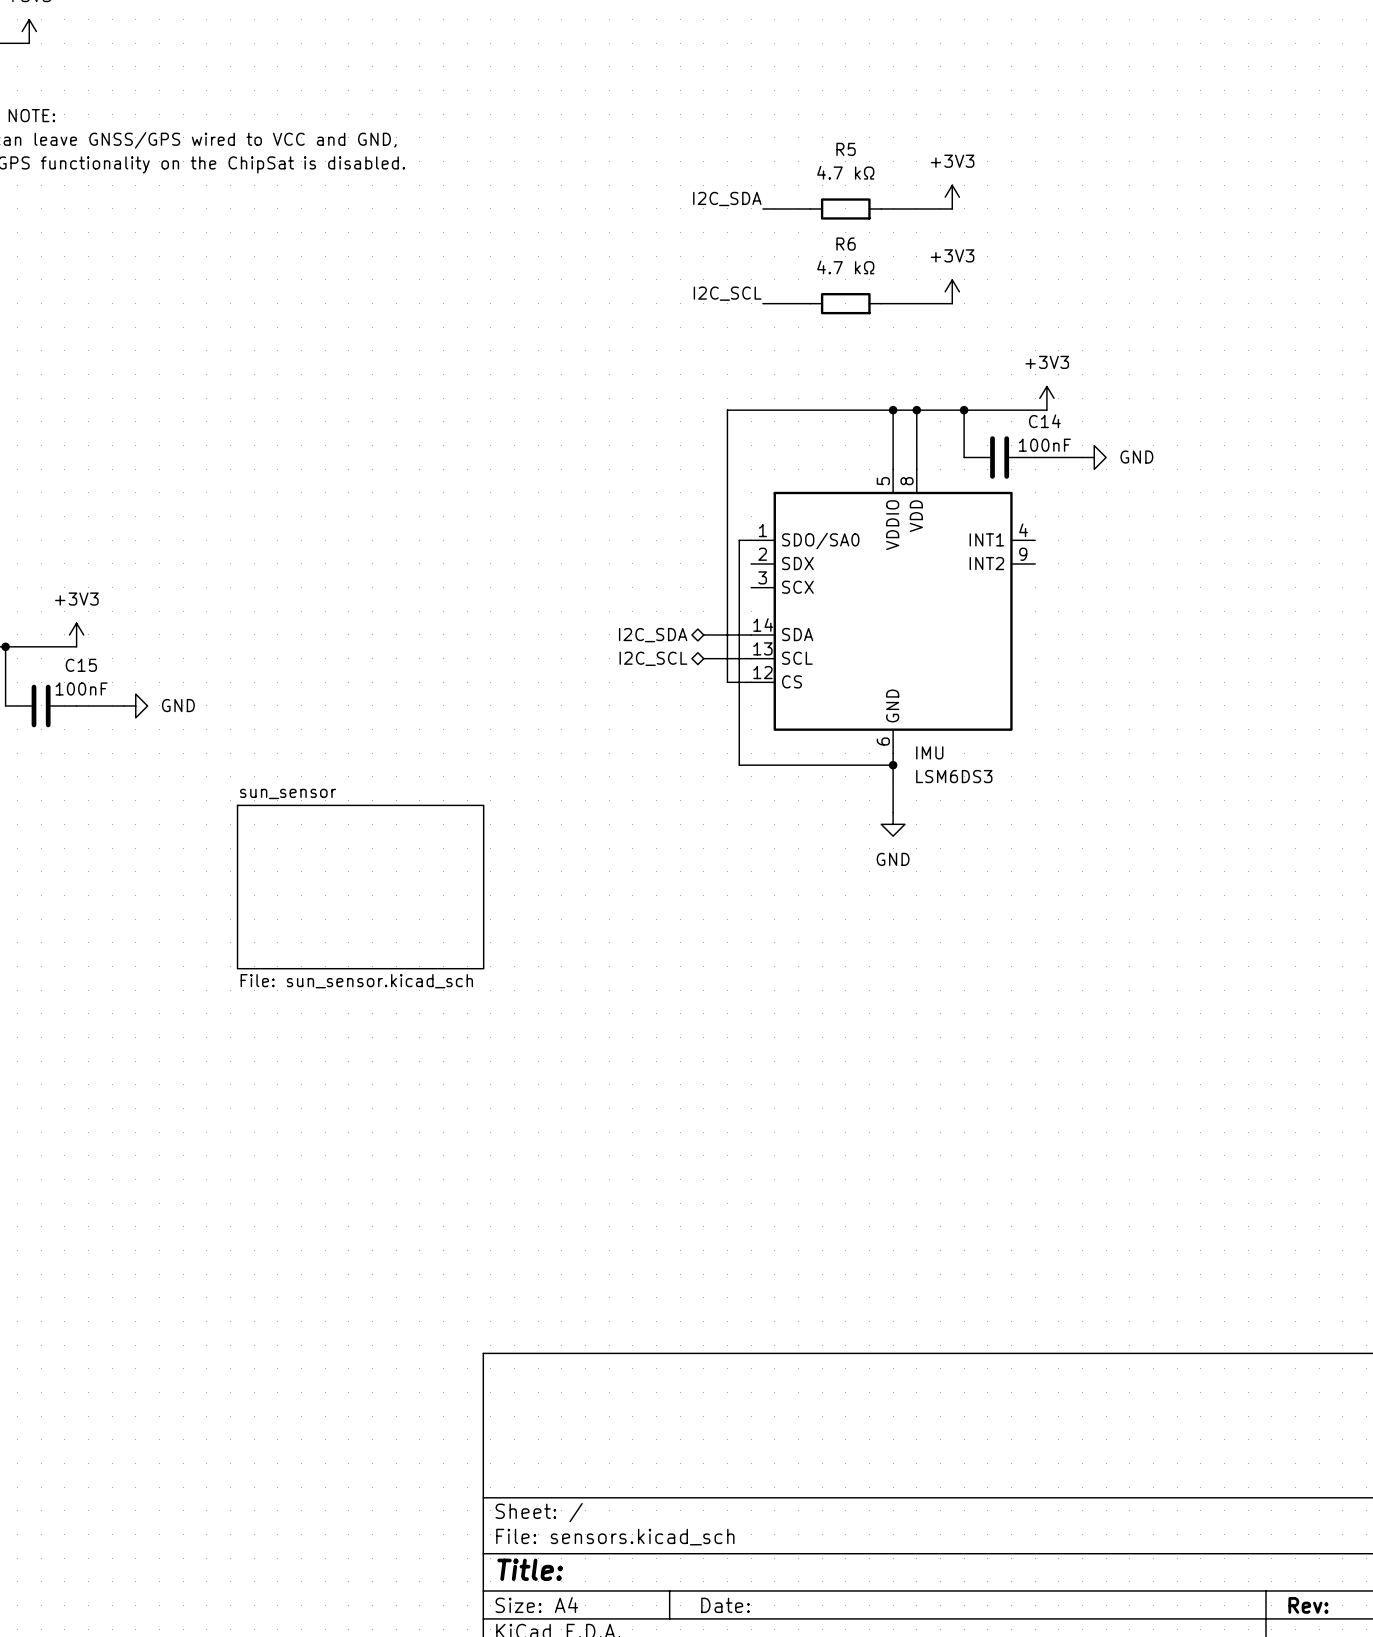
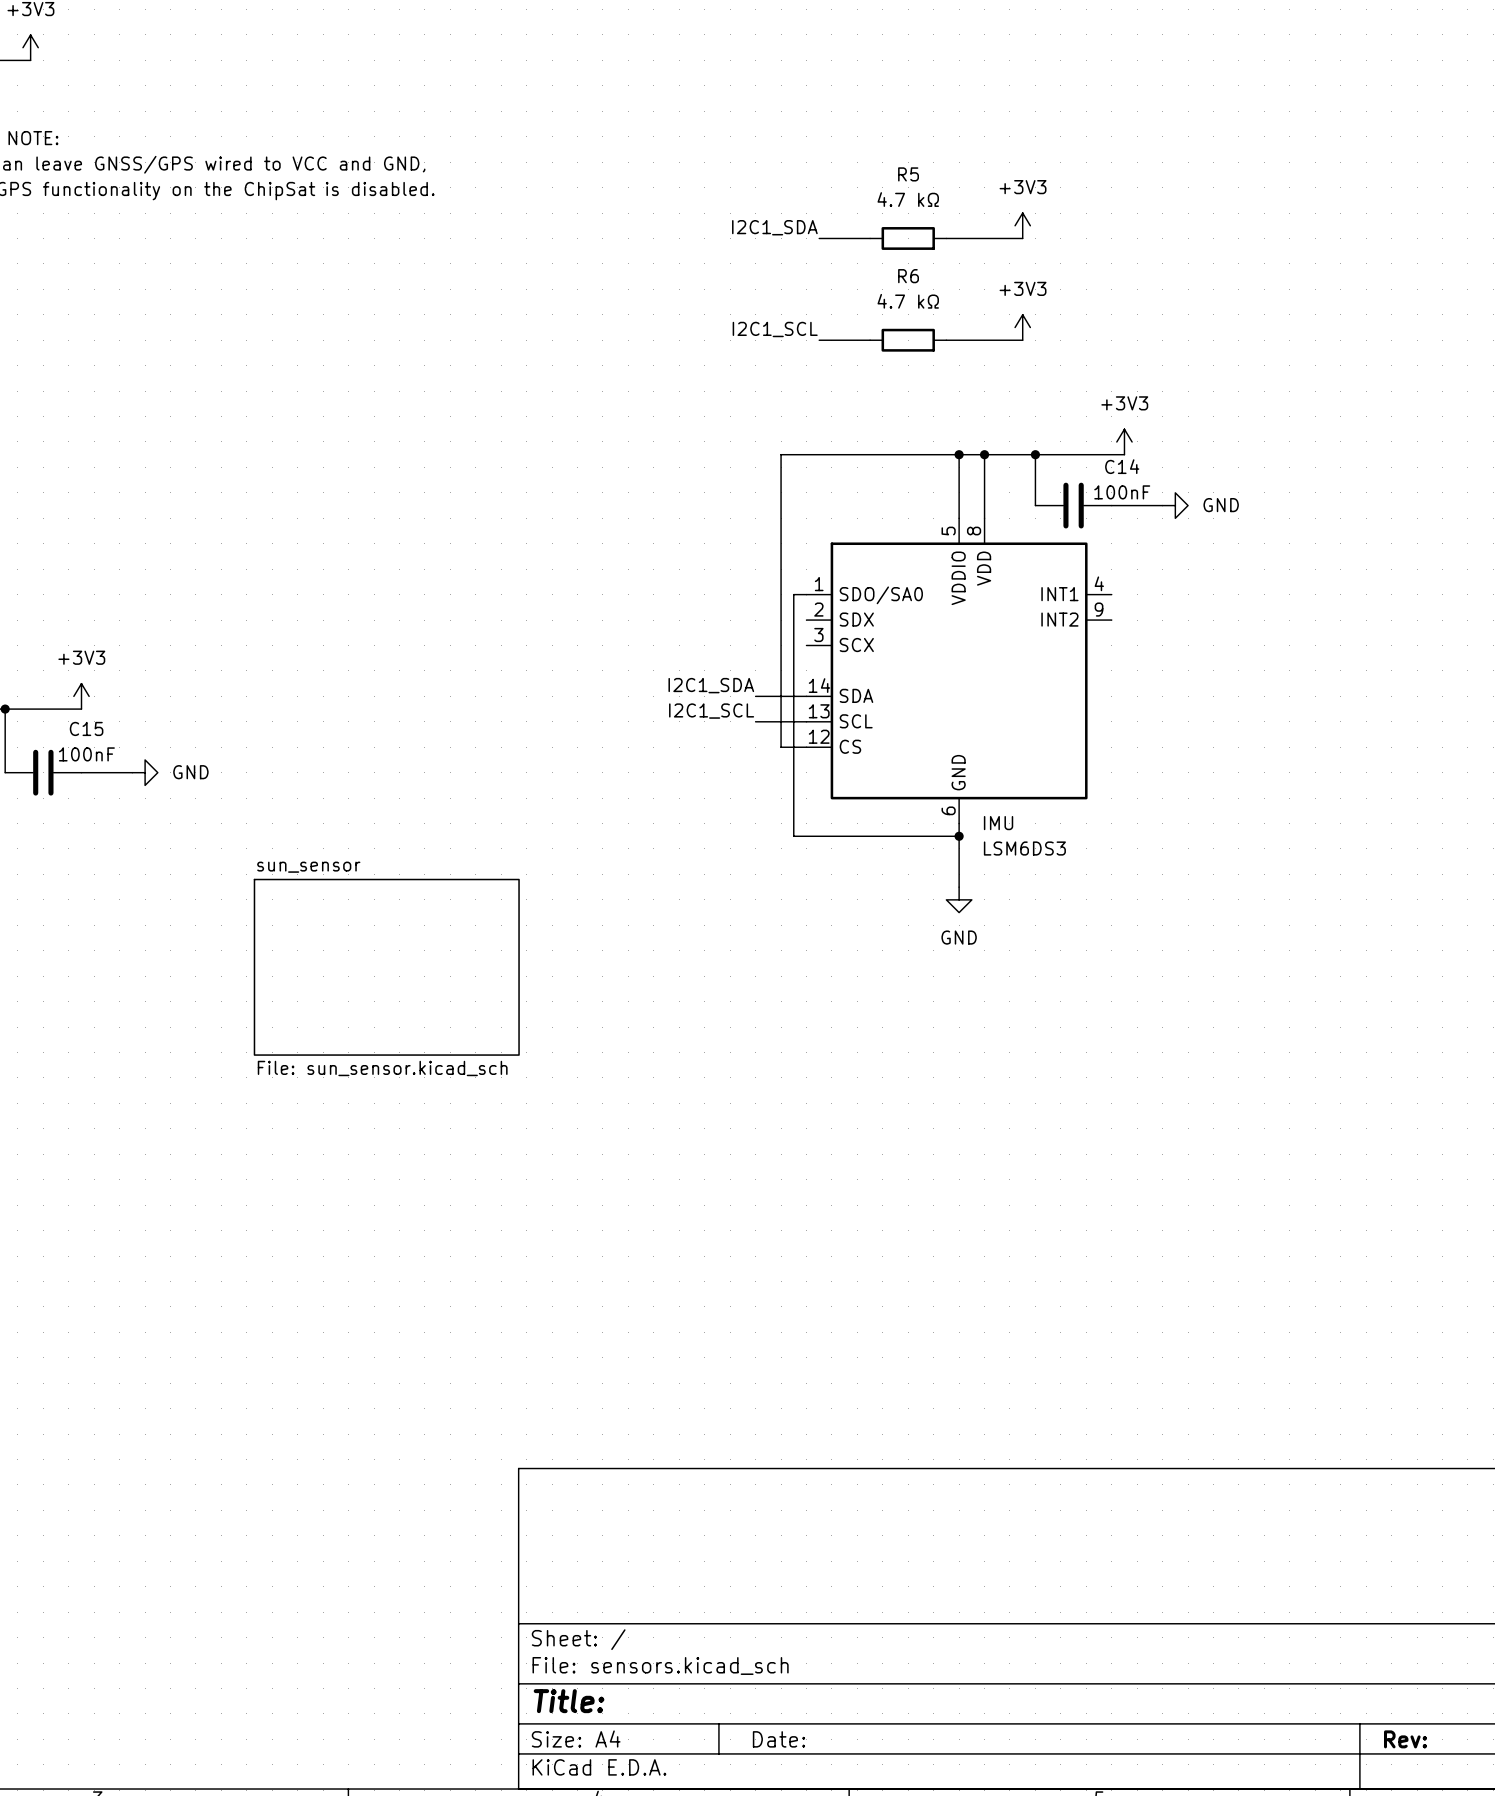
label: I2C_SDA (727, 198) -> I2C1_SDA (774, 227)
label: I2C_SCL (727, 293) -> I2C1_SCL (775, 329)
label: none -> I2C1_SDA (711, 685)
hierarchical label: I2C_SDA (653, 635) -> none
label: none -> I2C1_SCL (711, 711)
hierarchical label: I2C_SCL (653, 658) -> none

